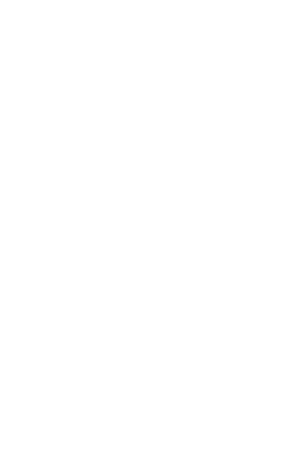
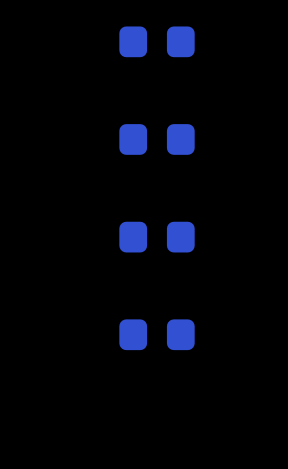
part: none -> (157, 41)
part: none -> (157, 139)
part: none -> (157, 237)
part: none -> (157, 334)

